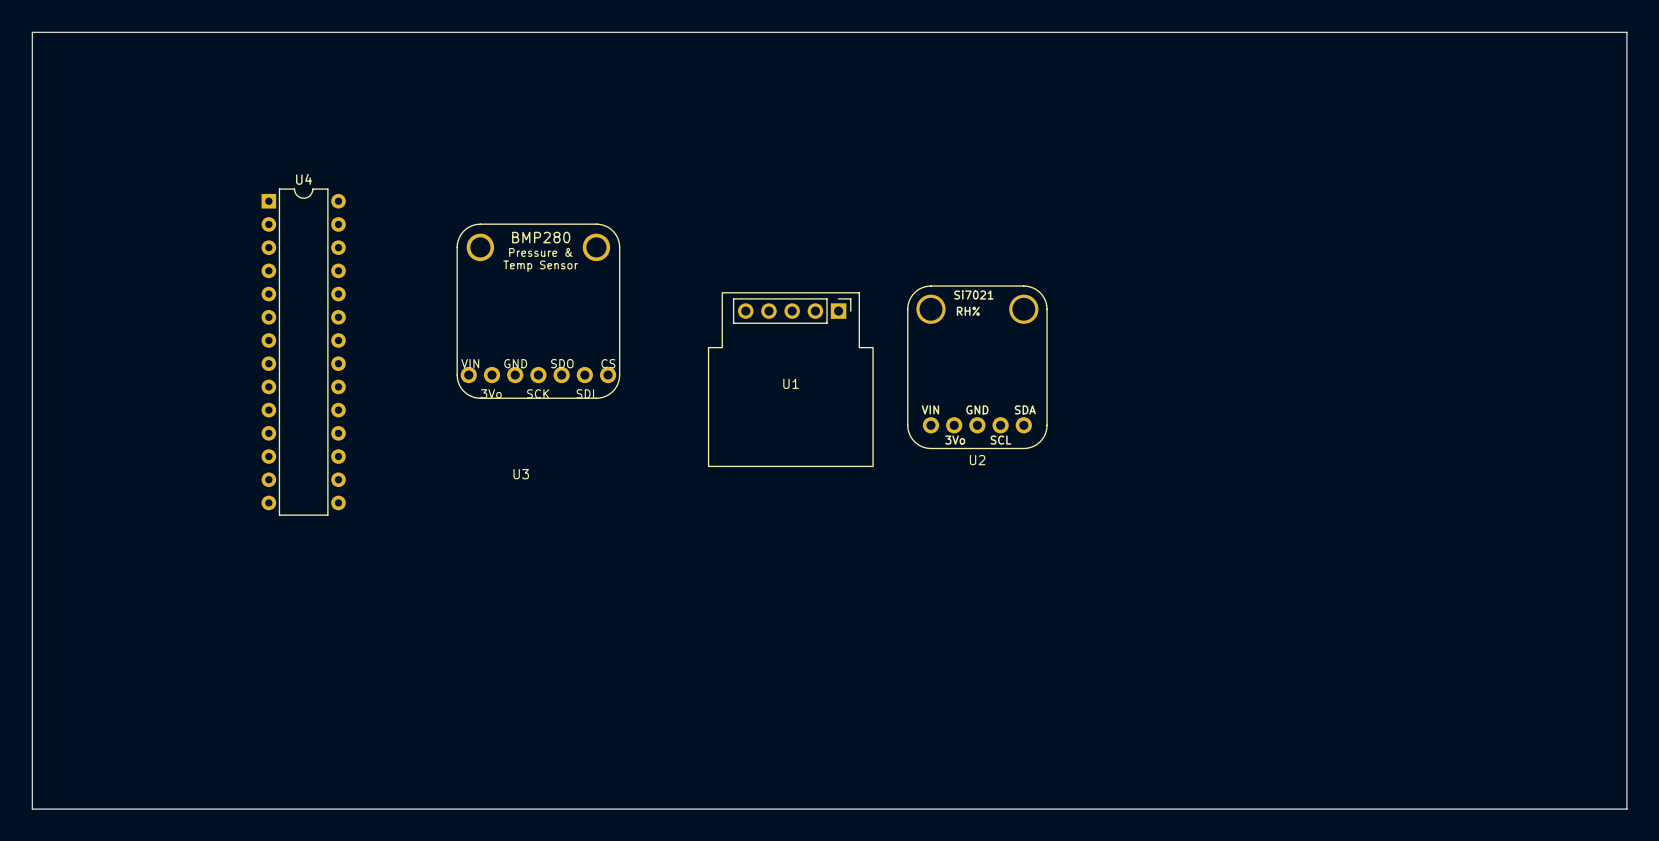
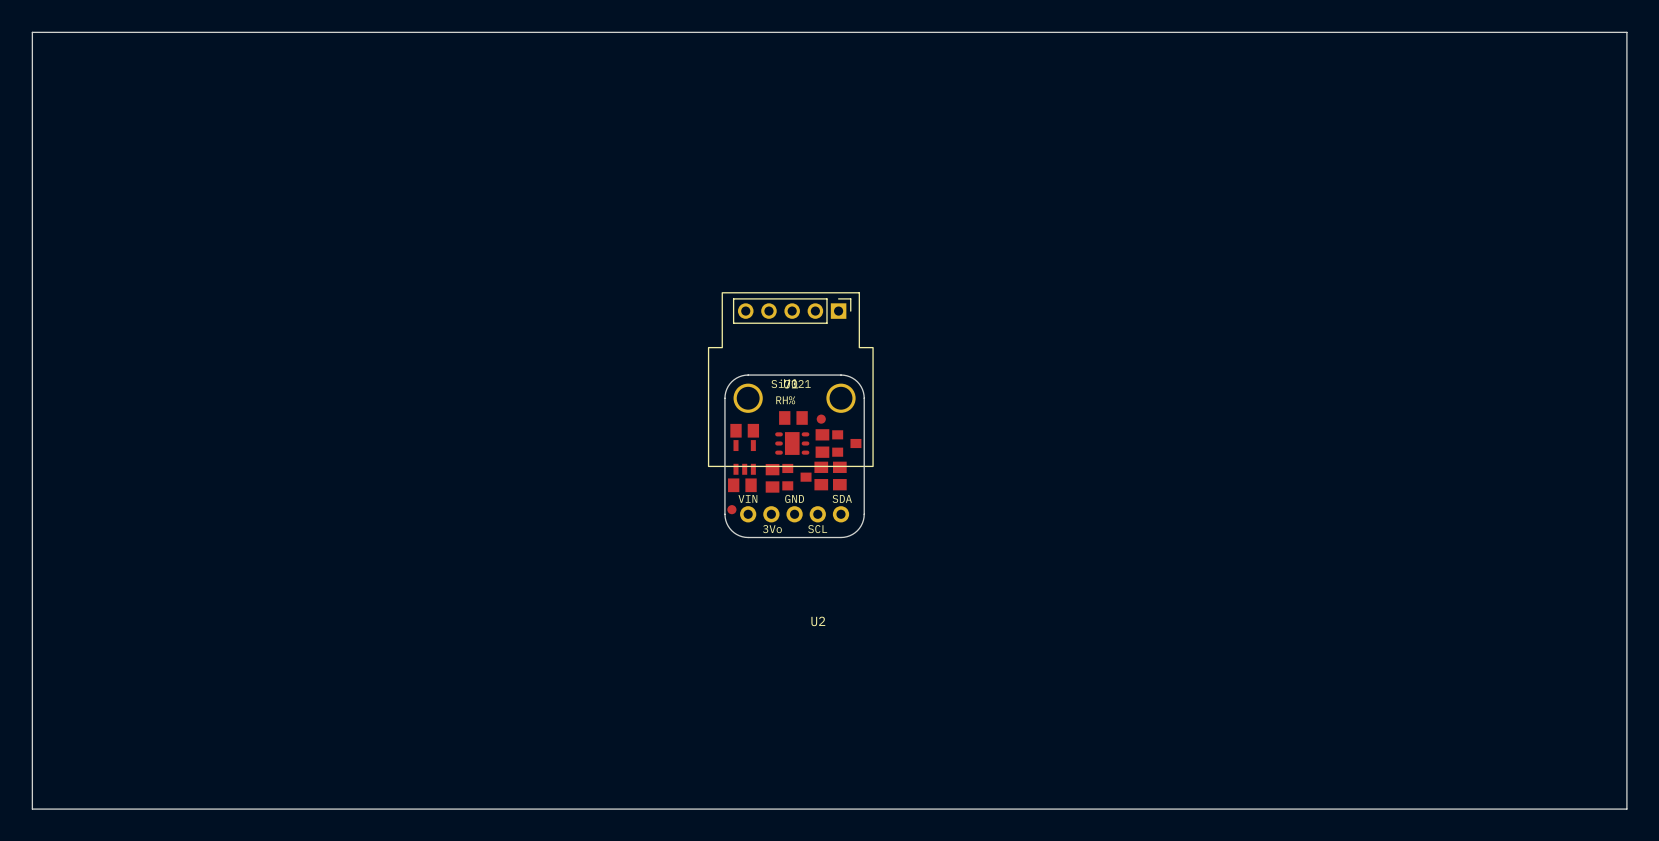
U2 footprint: [907, 285, 1048, 449] -> [724, 374, 865, 538]
U3: (538, 311) -> none
U4: (303, 352) -> none
U2 name position: U2 (977, 460) -> U2 (818, 621)

